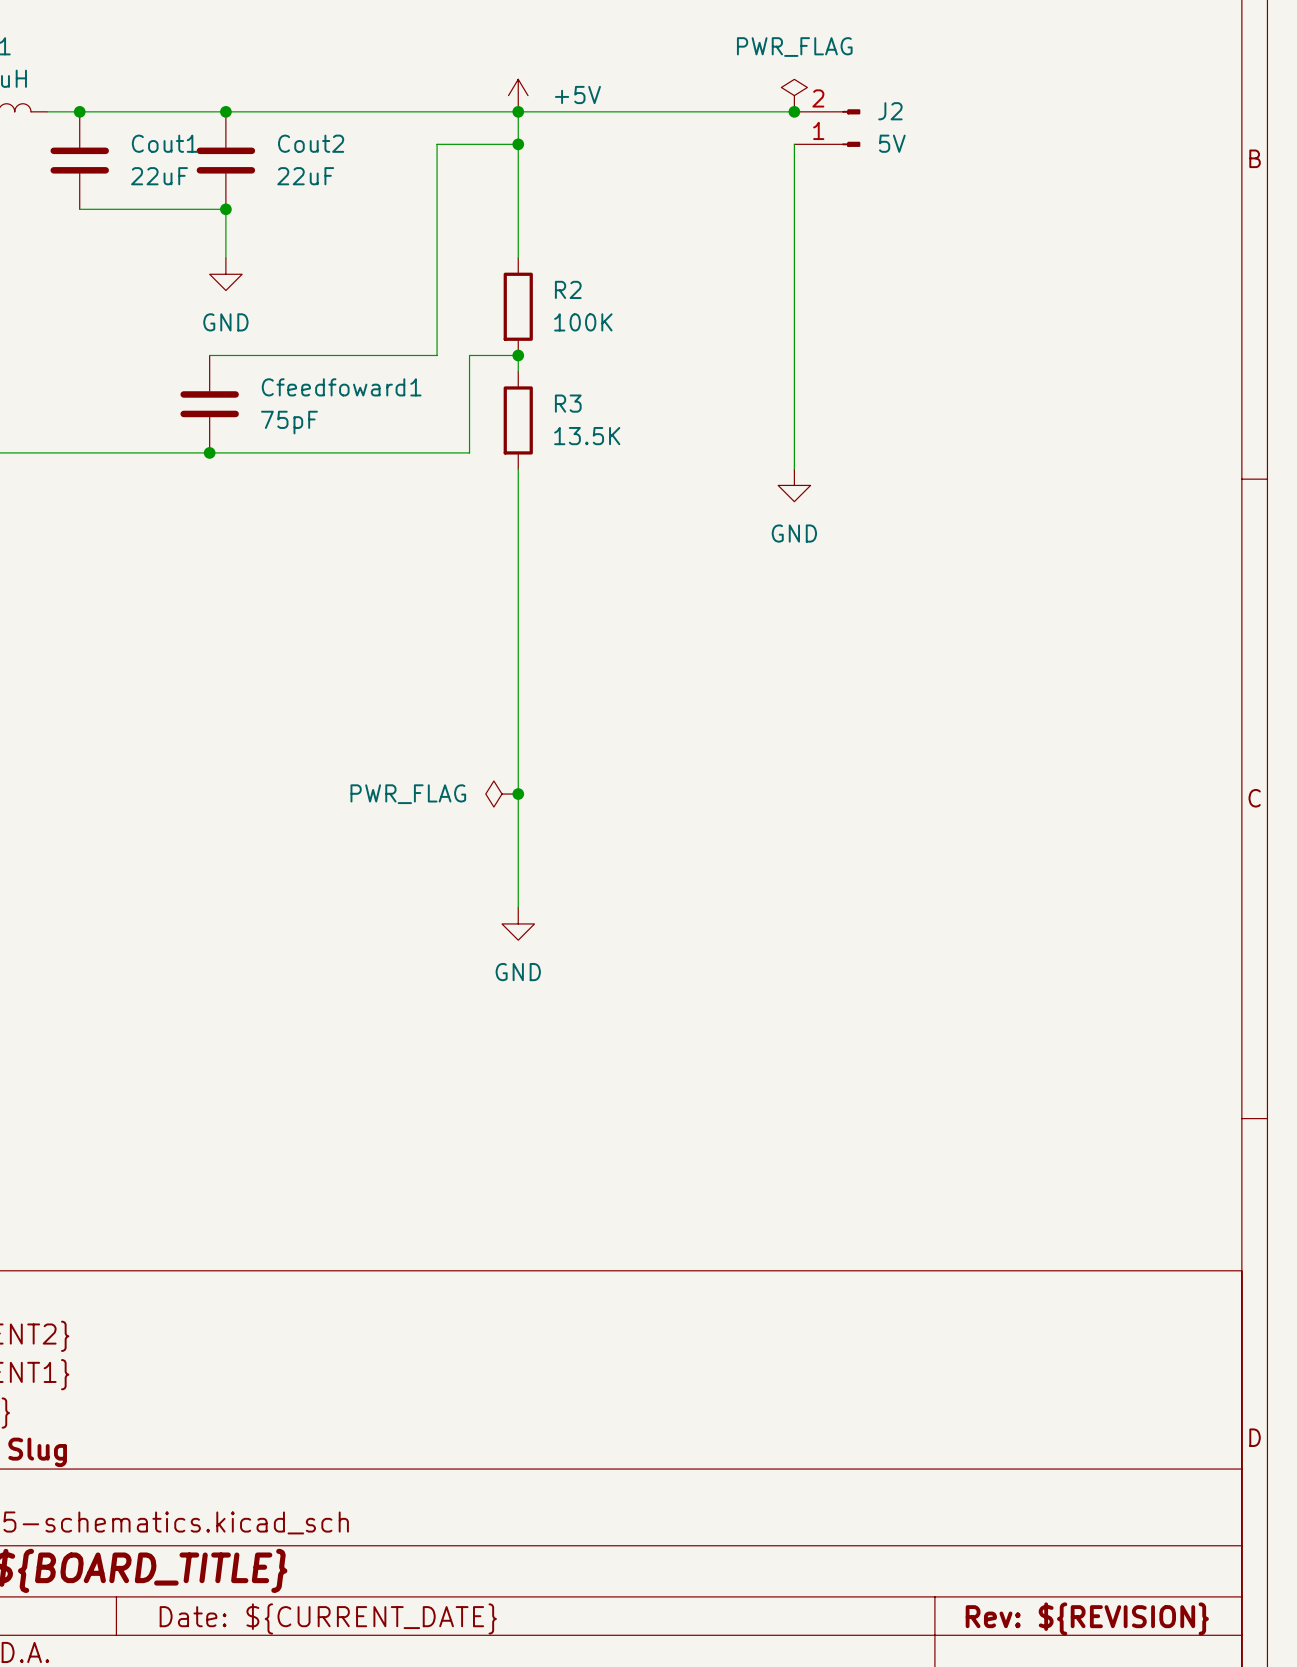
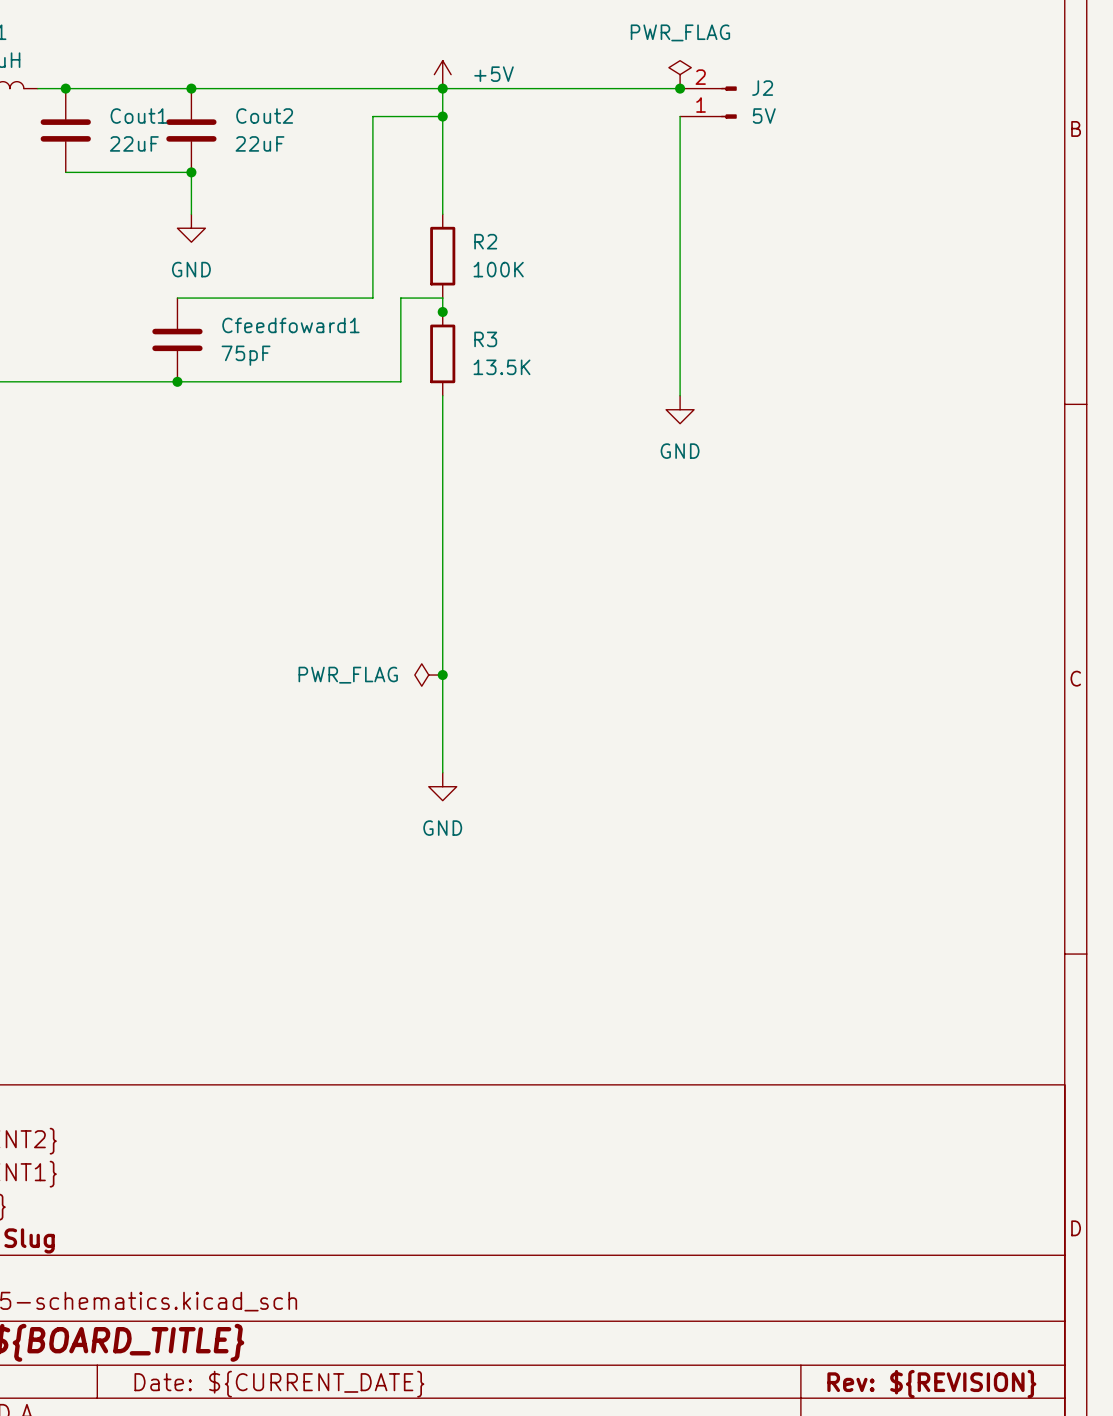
junction position: (518, 355) -> (442, 312)

